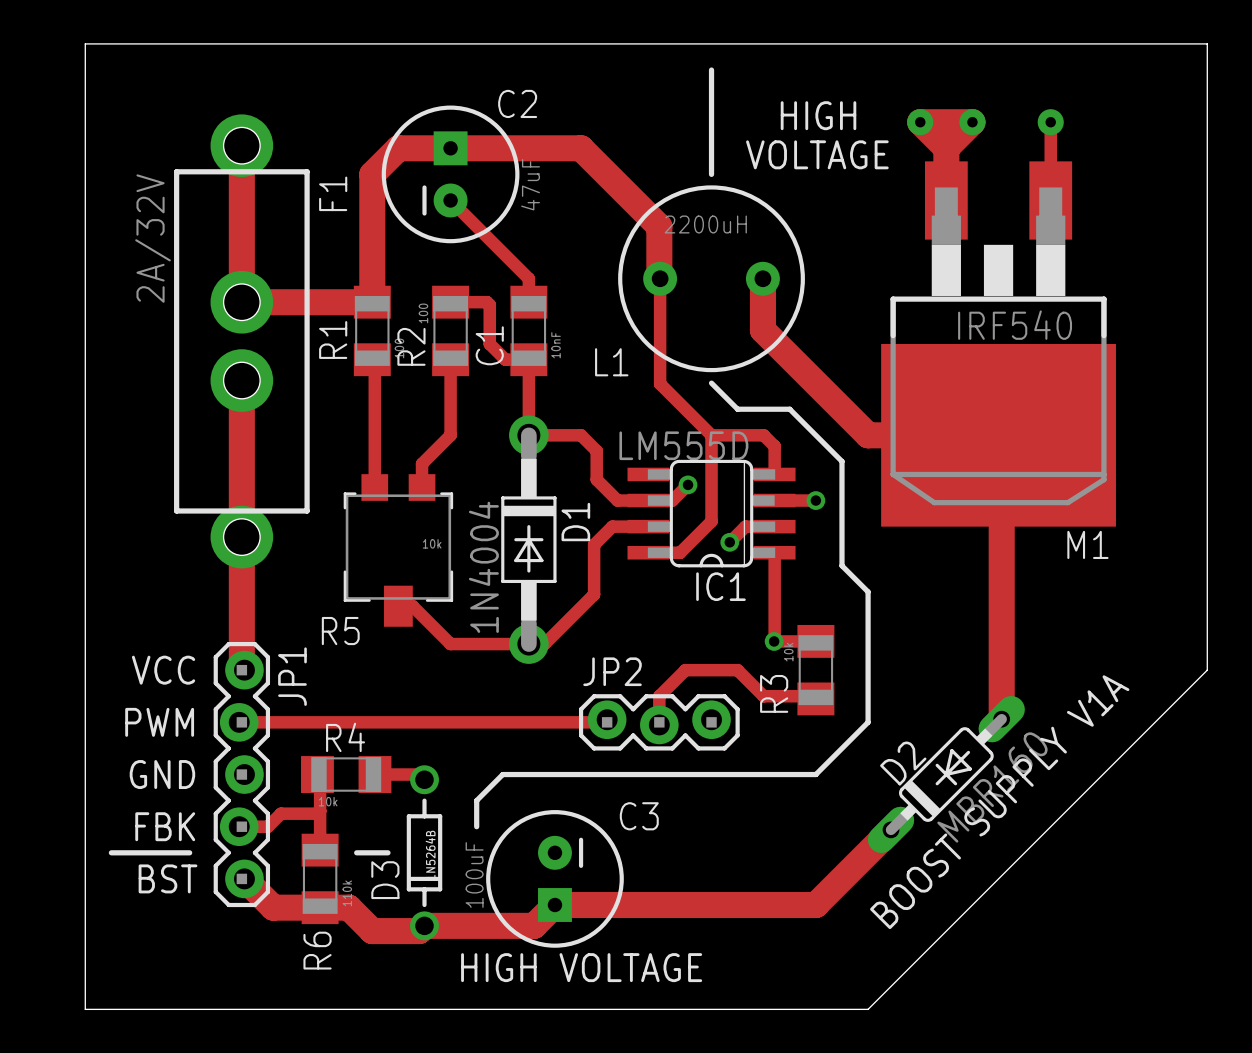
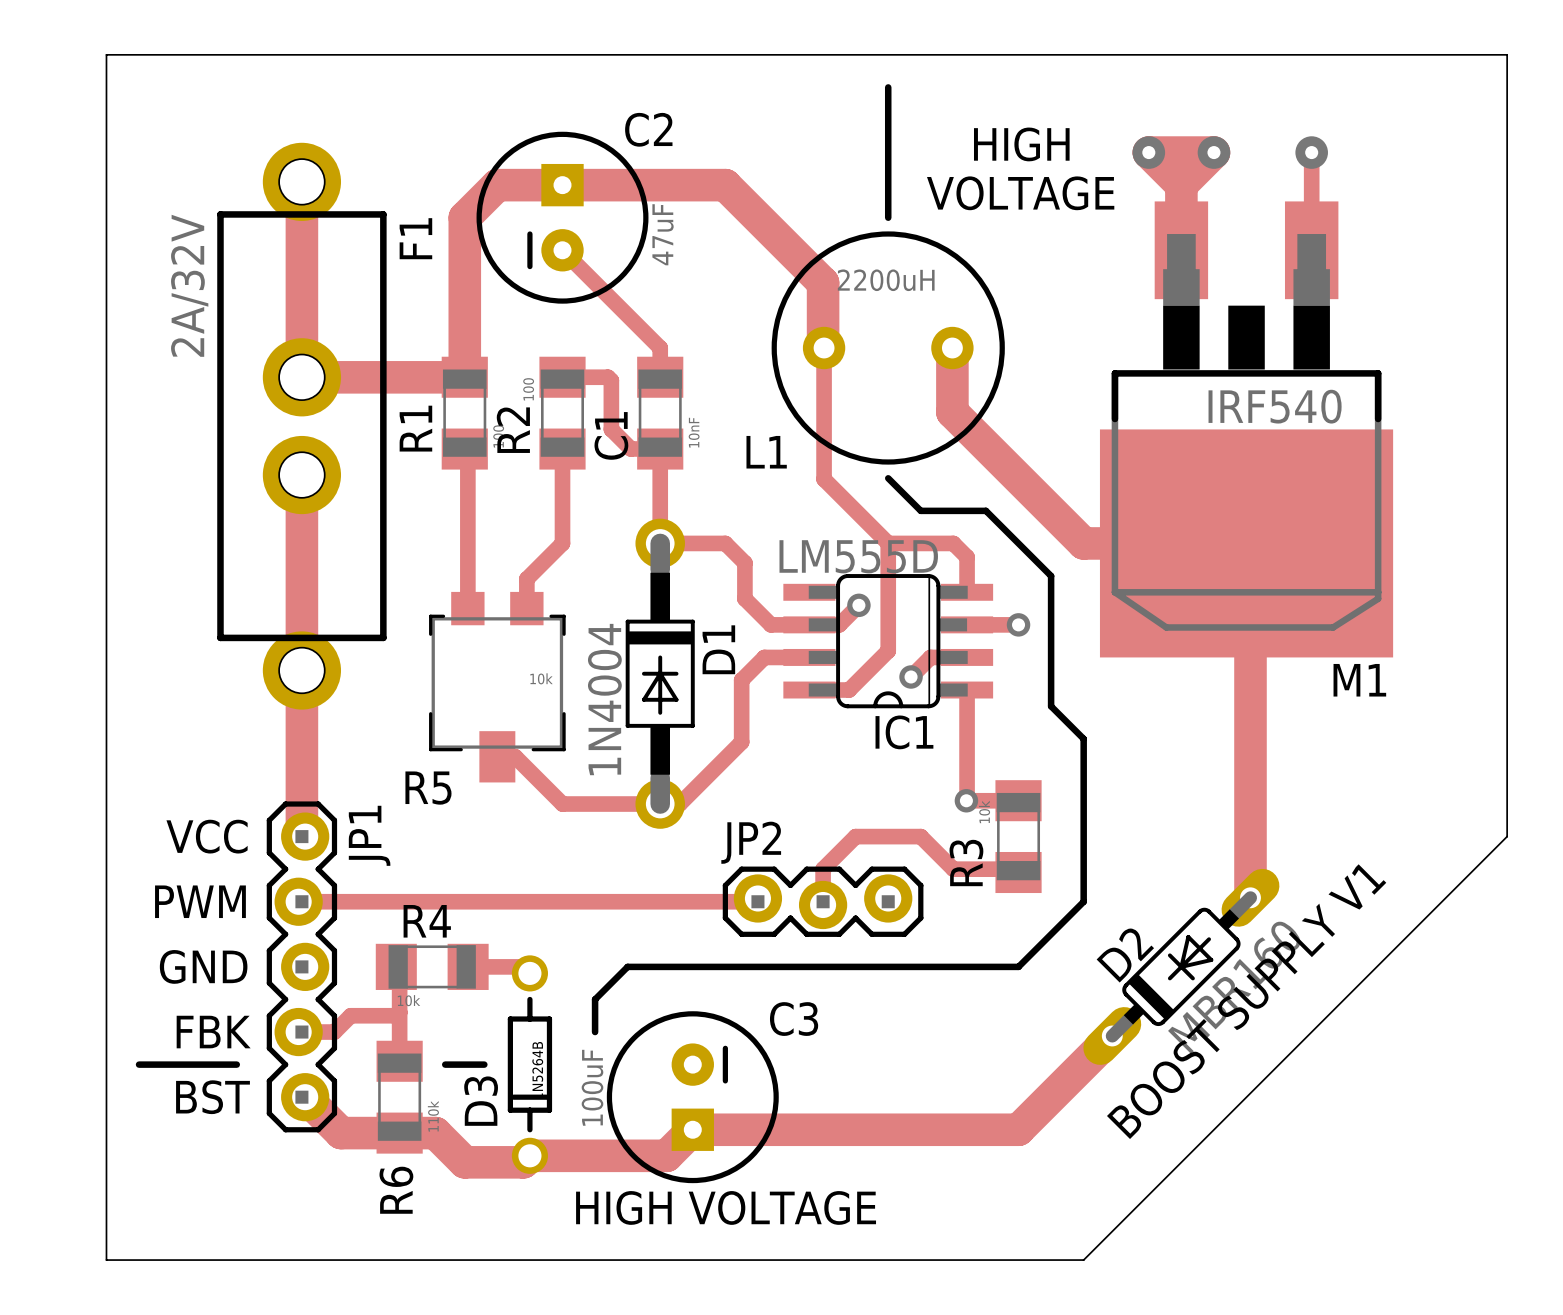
text: BOOST SUPPLY V1A (999, 802) -> BOOST SUPPLY V1 (1246, 1001)

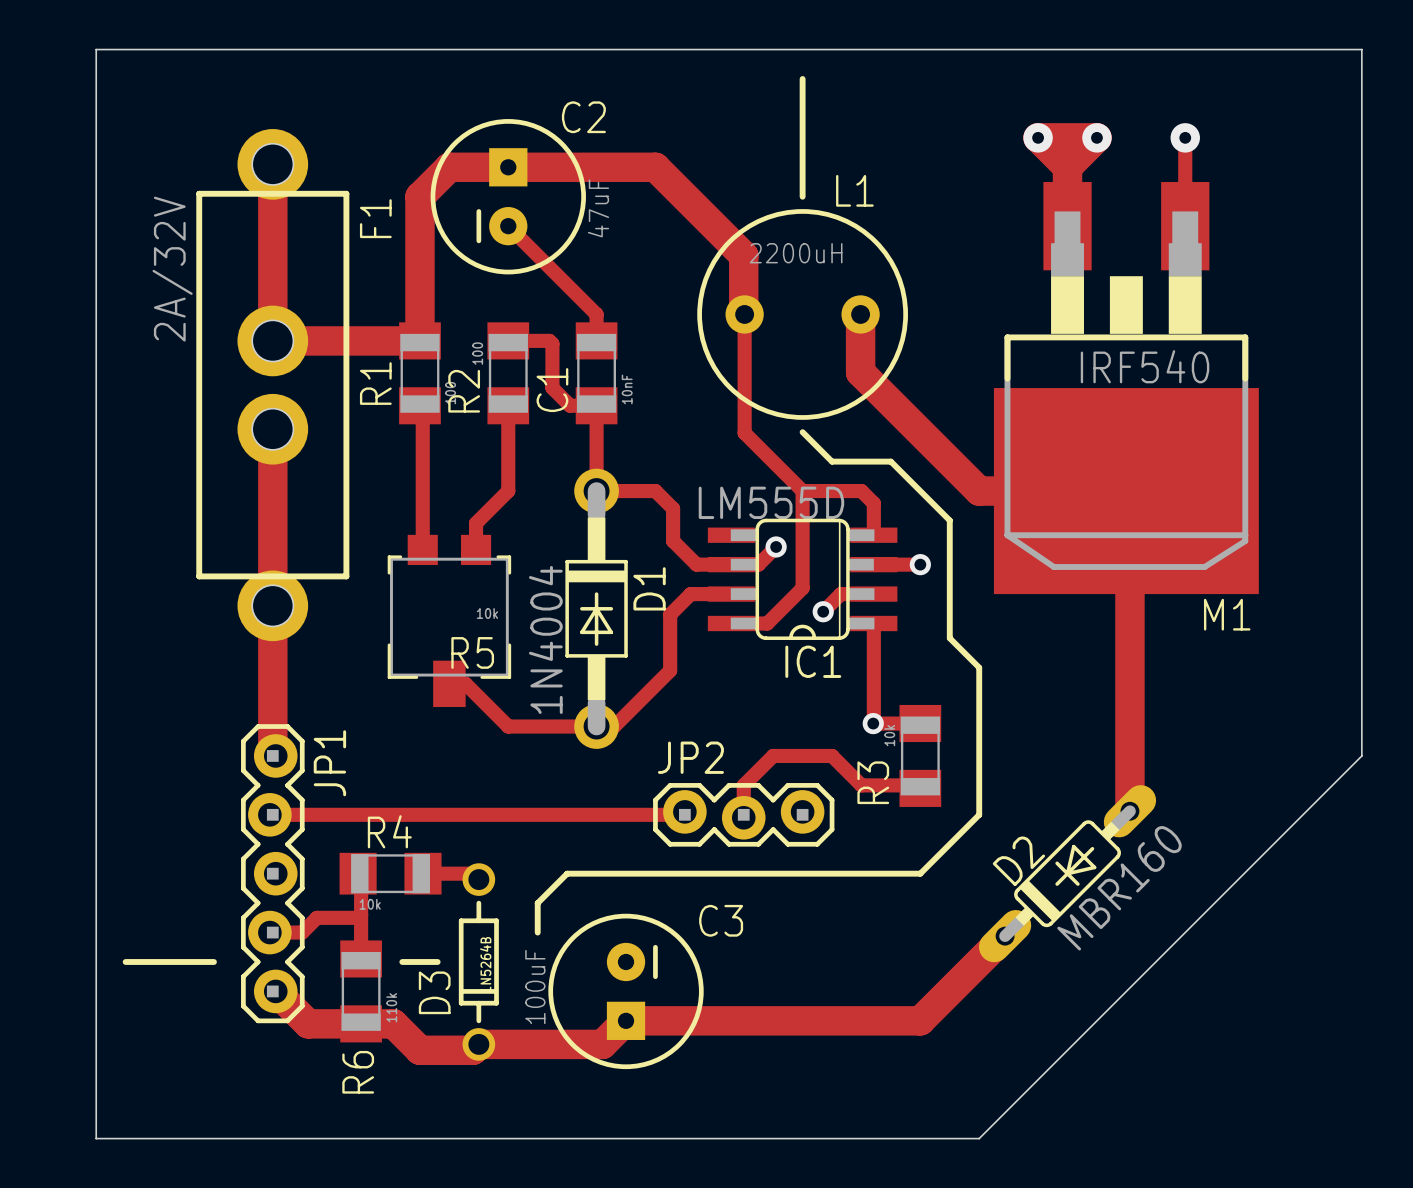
text: HIGH (1021, 144) -> none
text: VOLTAGE (1020, 193) -> none
L1 name position: L1 (766, 452) -> L1 (854, 190)
R5 name position: R5 (428, 788) -> R5 (472, 652)
text: VCC (207, 836) -> none
text: PWM (200, 901) -> none
text: GND (203, 966) -> none
text: BOOST SUPPLY V1 (1246, 1001) -> none
text: FBK (213, 1032) -> none
text: BST (213, 1097) -> none
text: HIGH VOLTAGE (726, 1207) -> none

